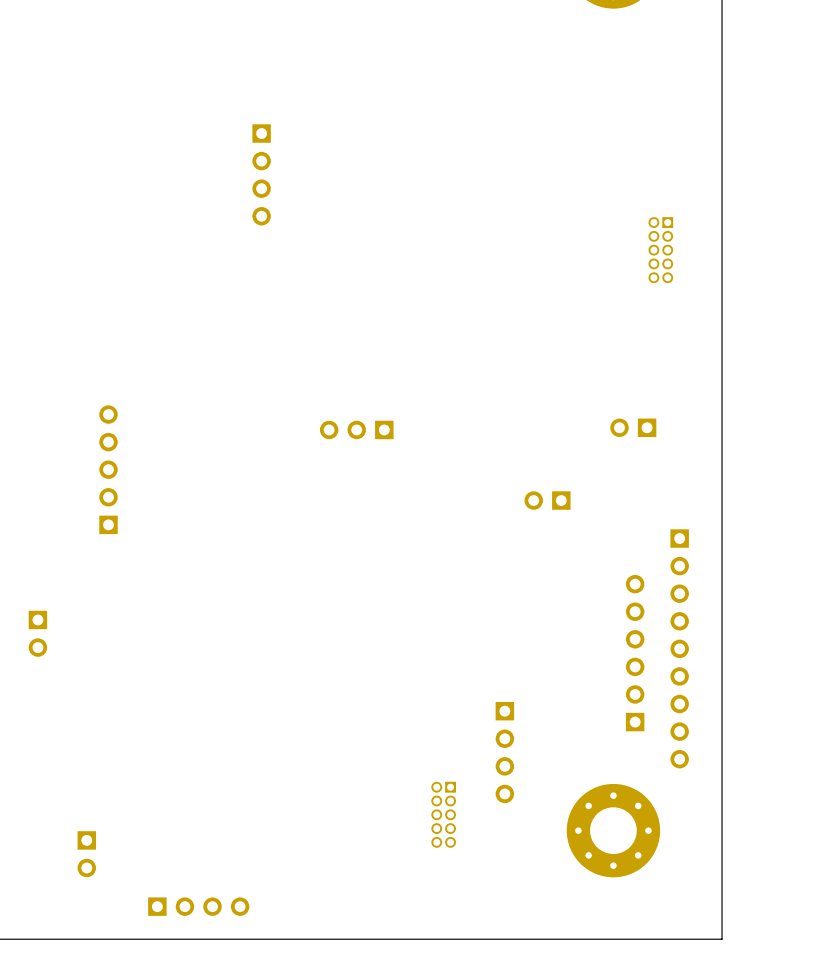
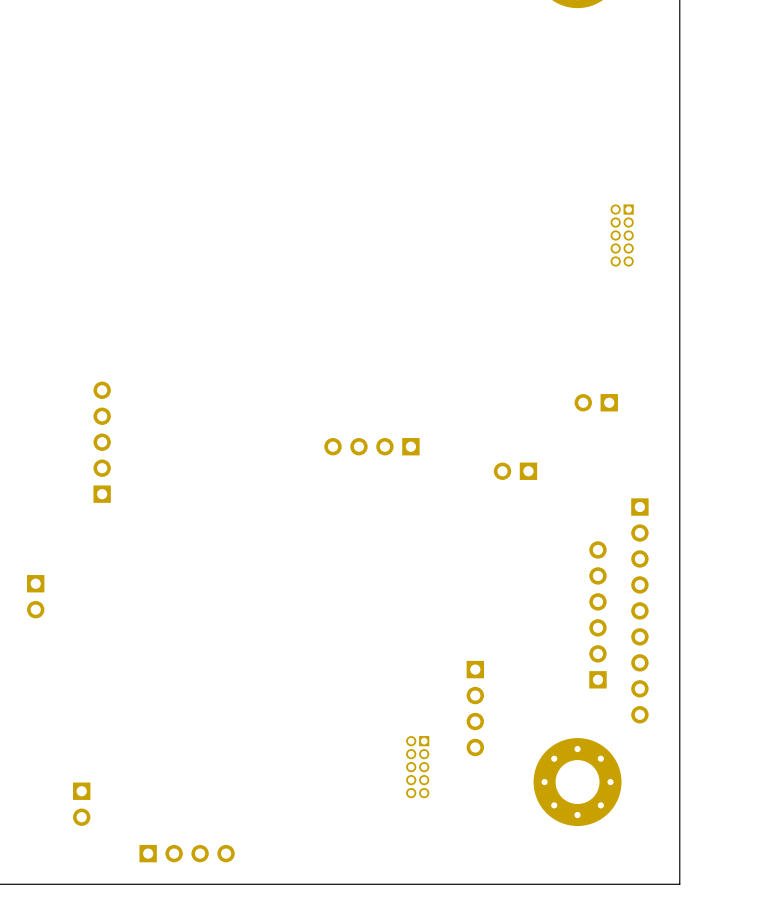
part: (261, 174) -> none
part: (356, 429) -> none
part: none -> (371, 446)

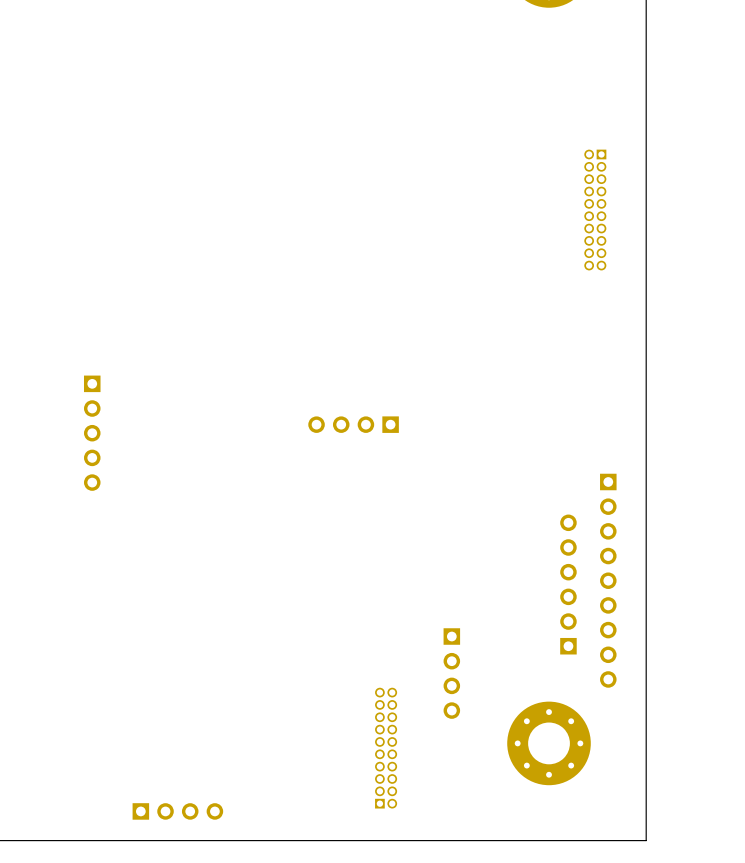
part: none -> (595, 210)
part: (622, 235) -> none
part: (596, 402) -> none
part rotation: 0° (102, 442) -> 180° (92, 433)
part: (515, 471) -> none
part: (35, 596) -> none
part: (417, 767) -> none
part: none -> (386, 748)
part: (81, 804) -> none

